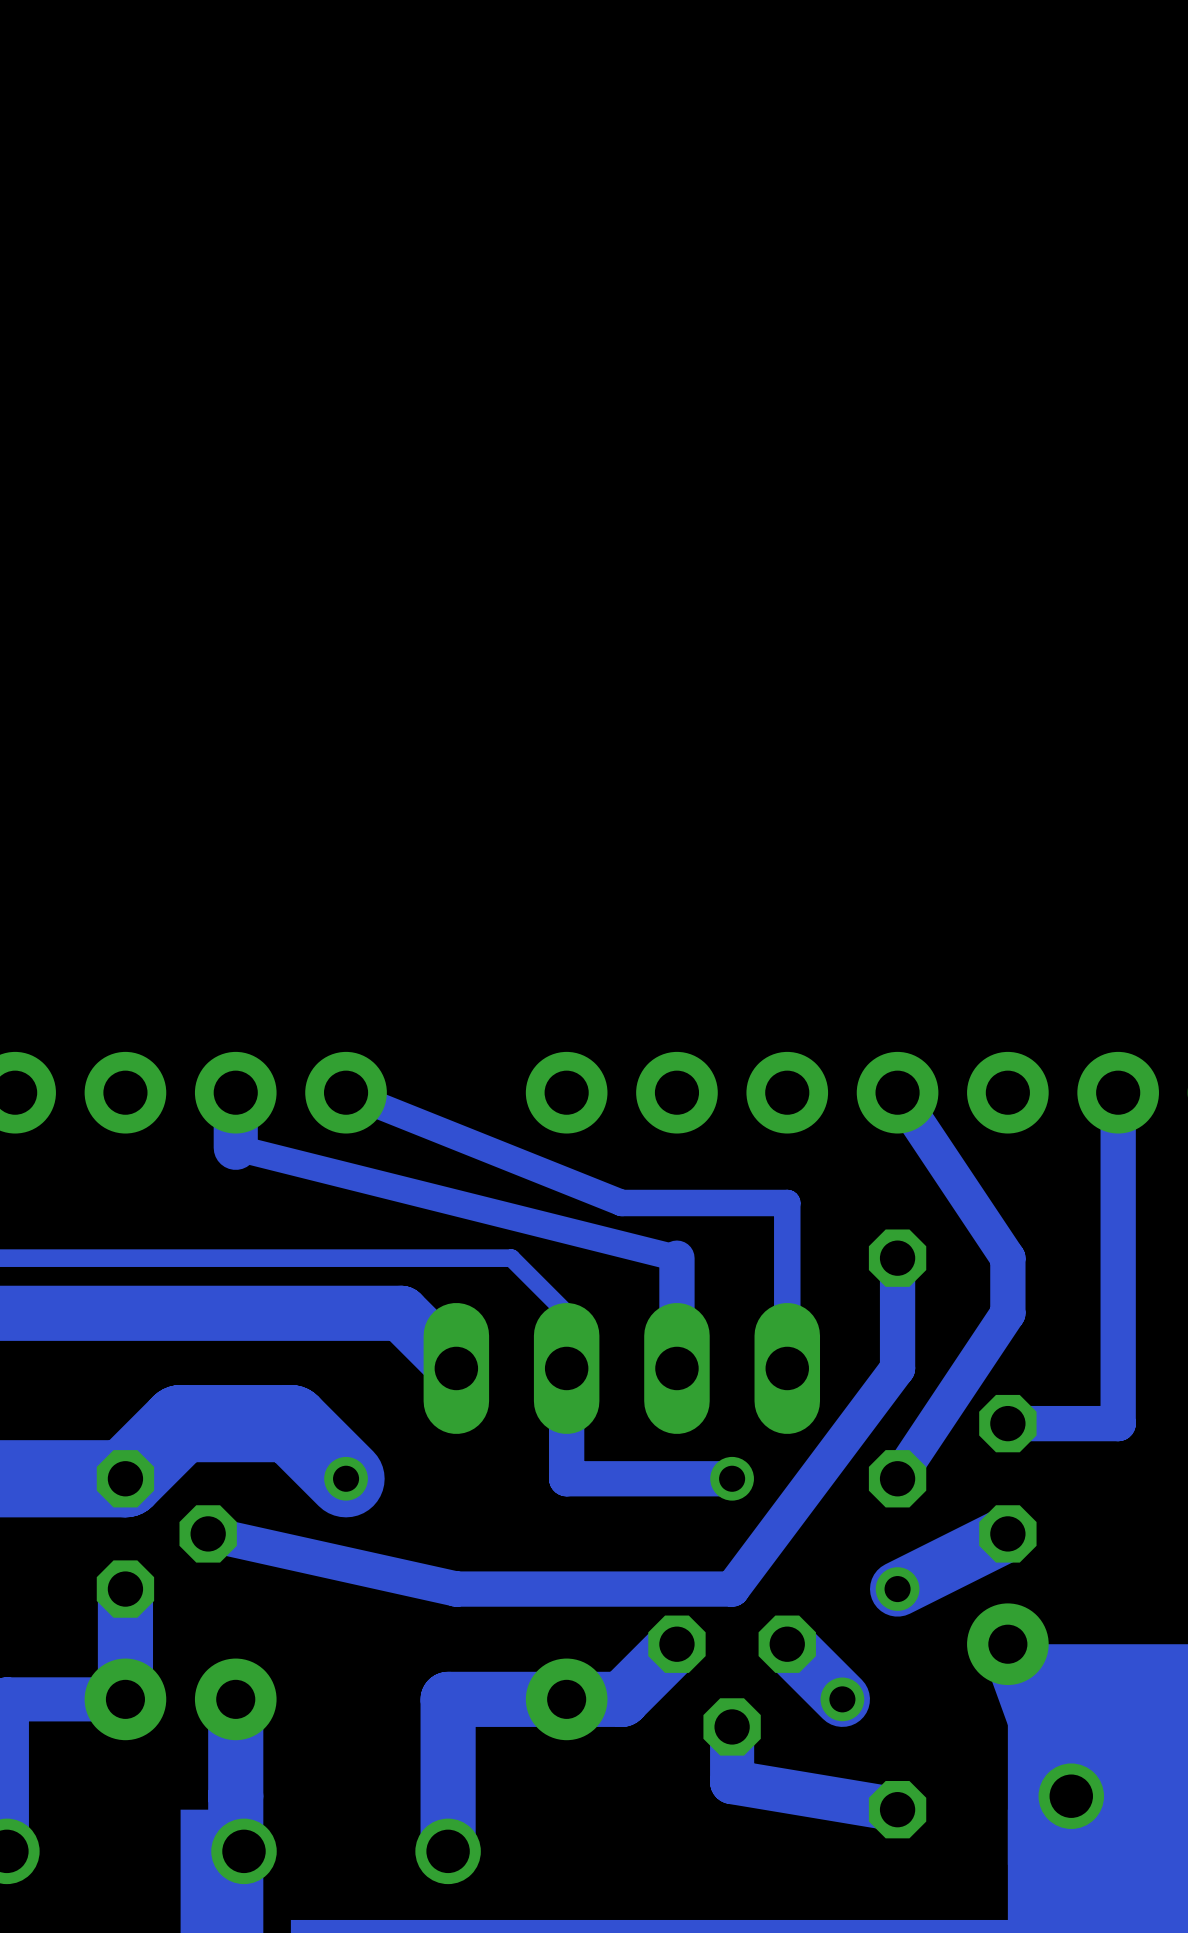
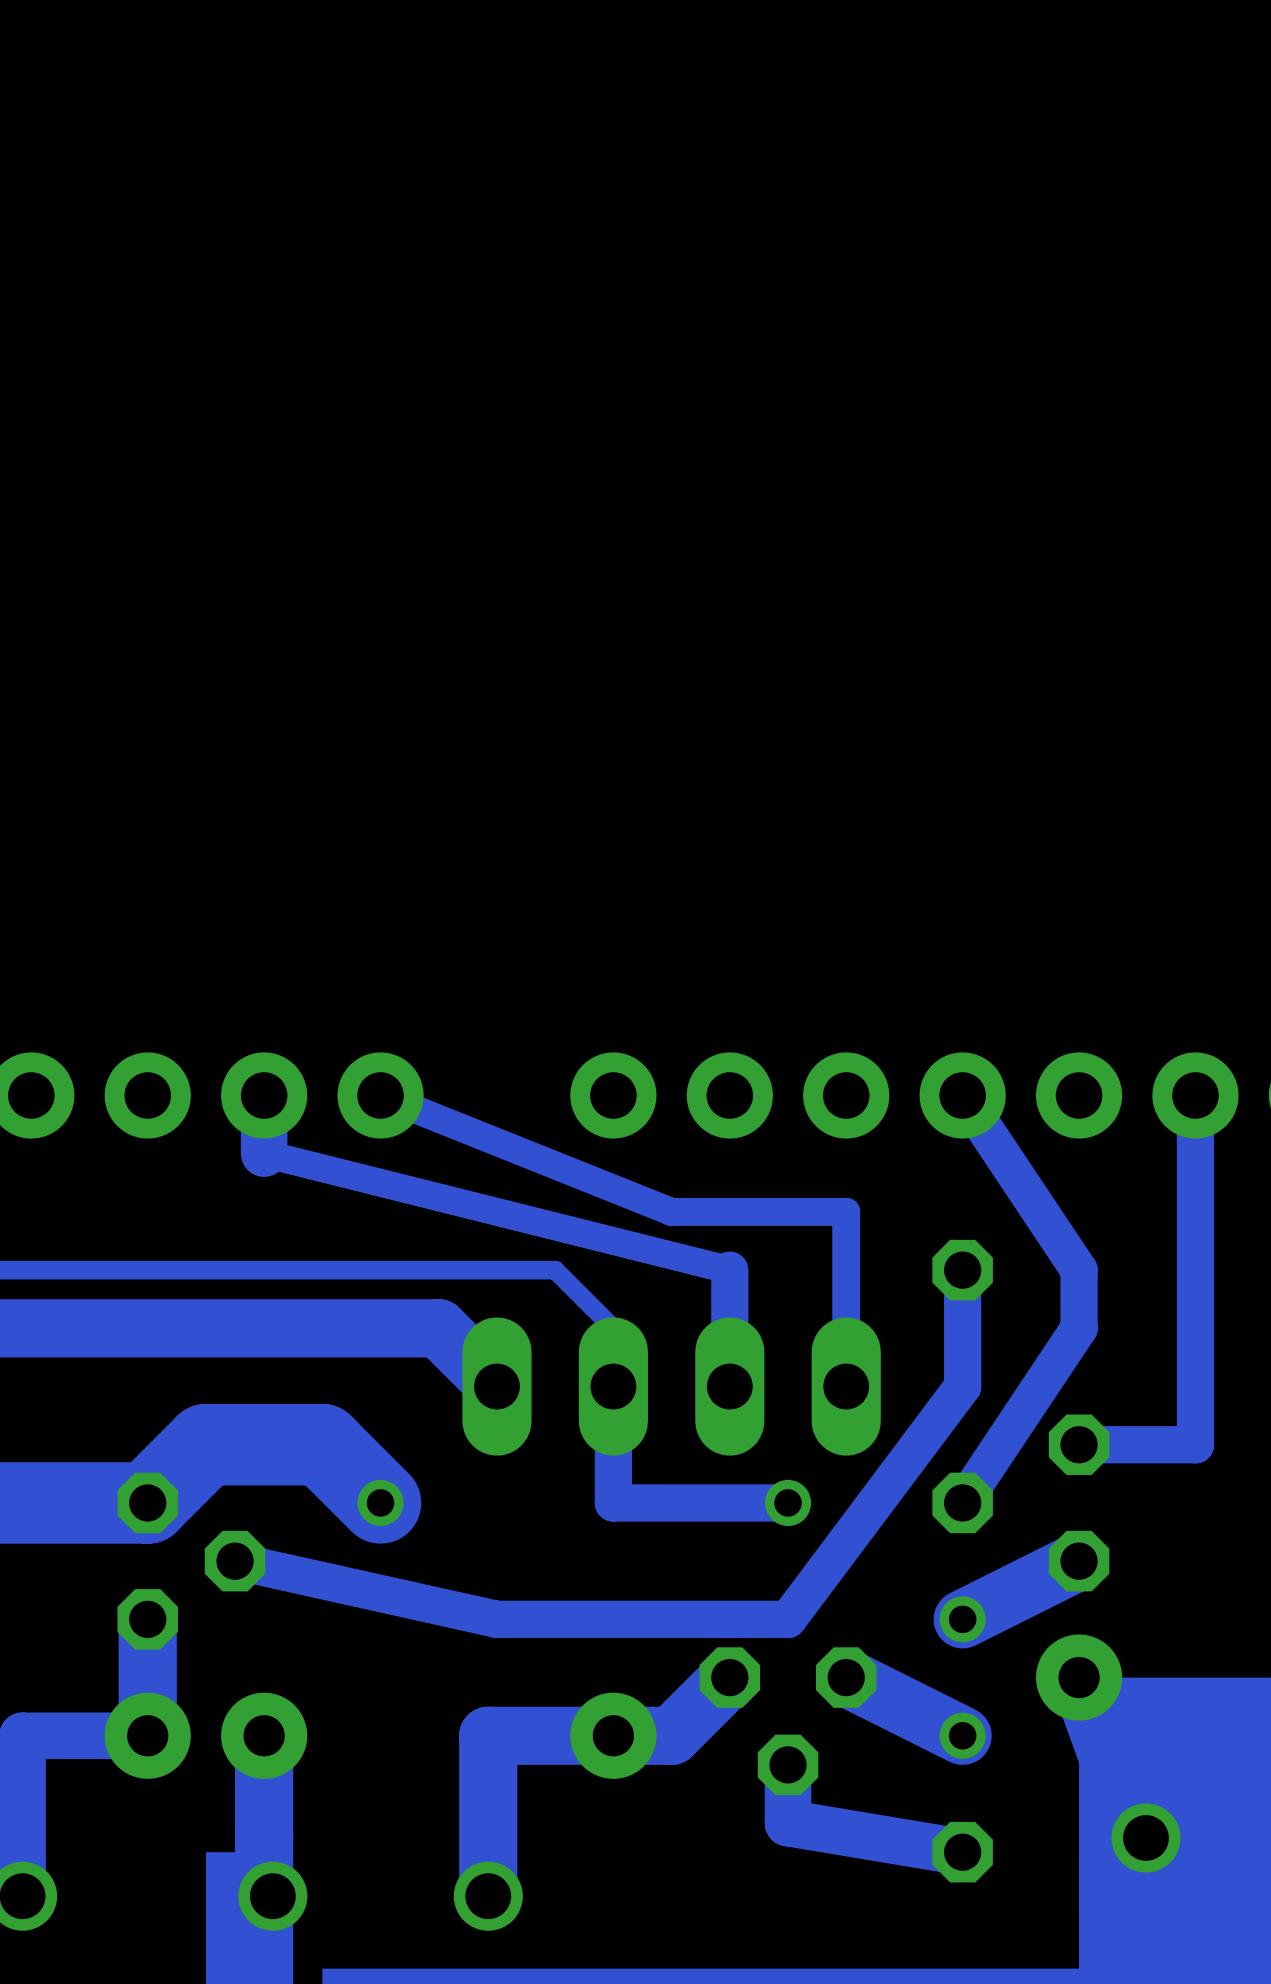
track: (787, 1644) (842, 1699) -> (846, 1677) (962, 1735)
via position: (842, 1699) -> (962, 1735)

